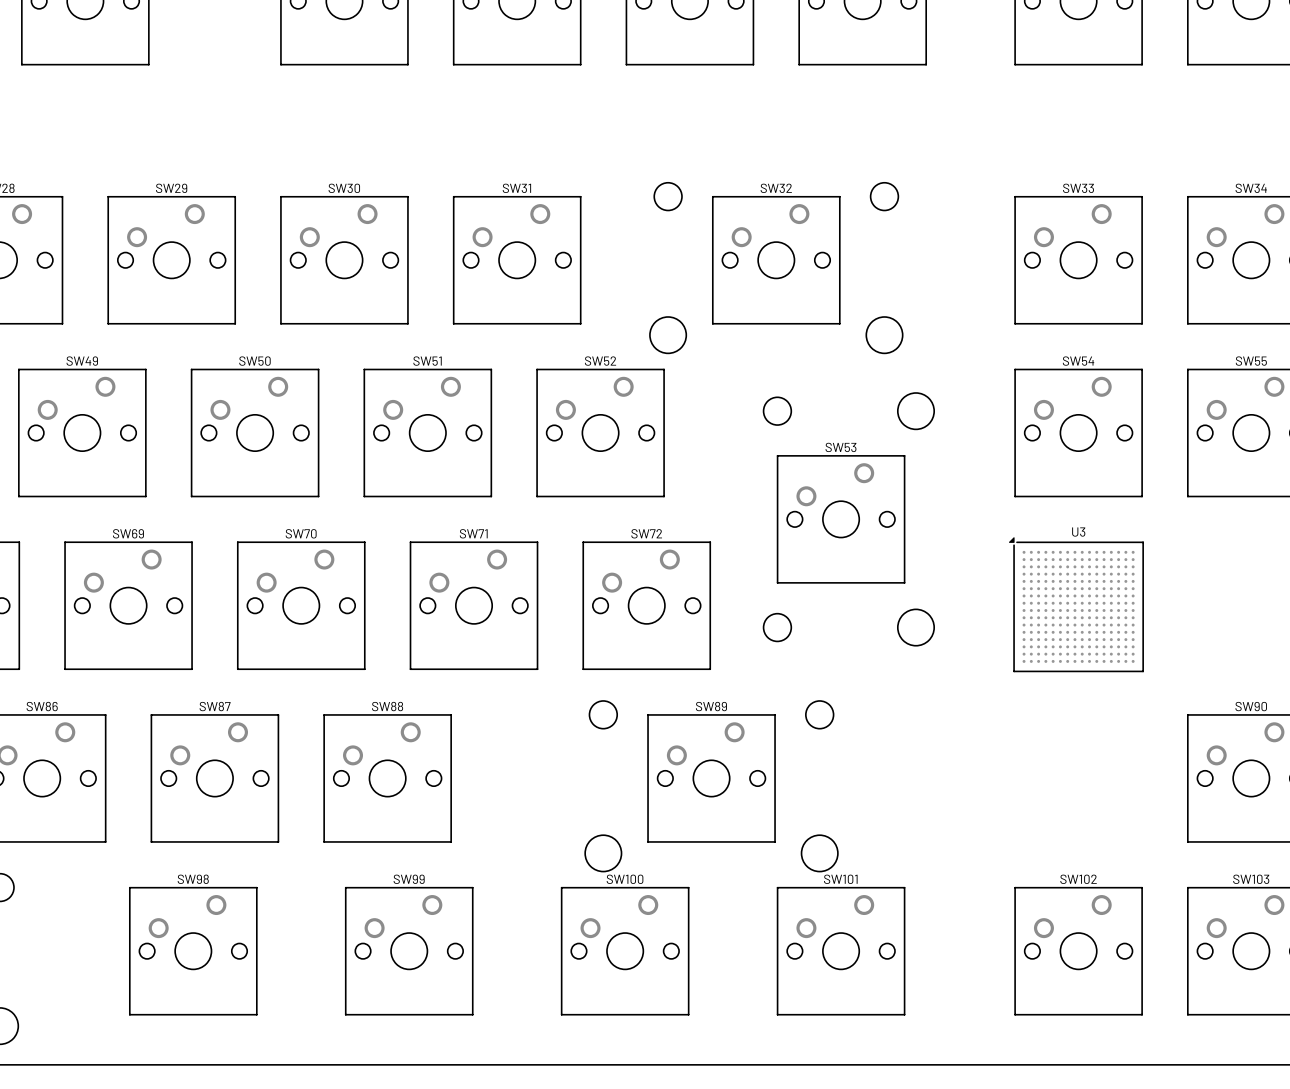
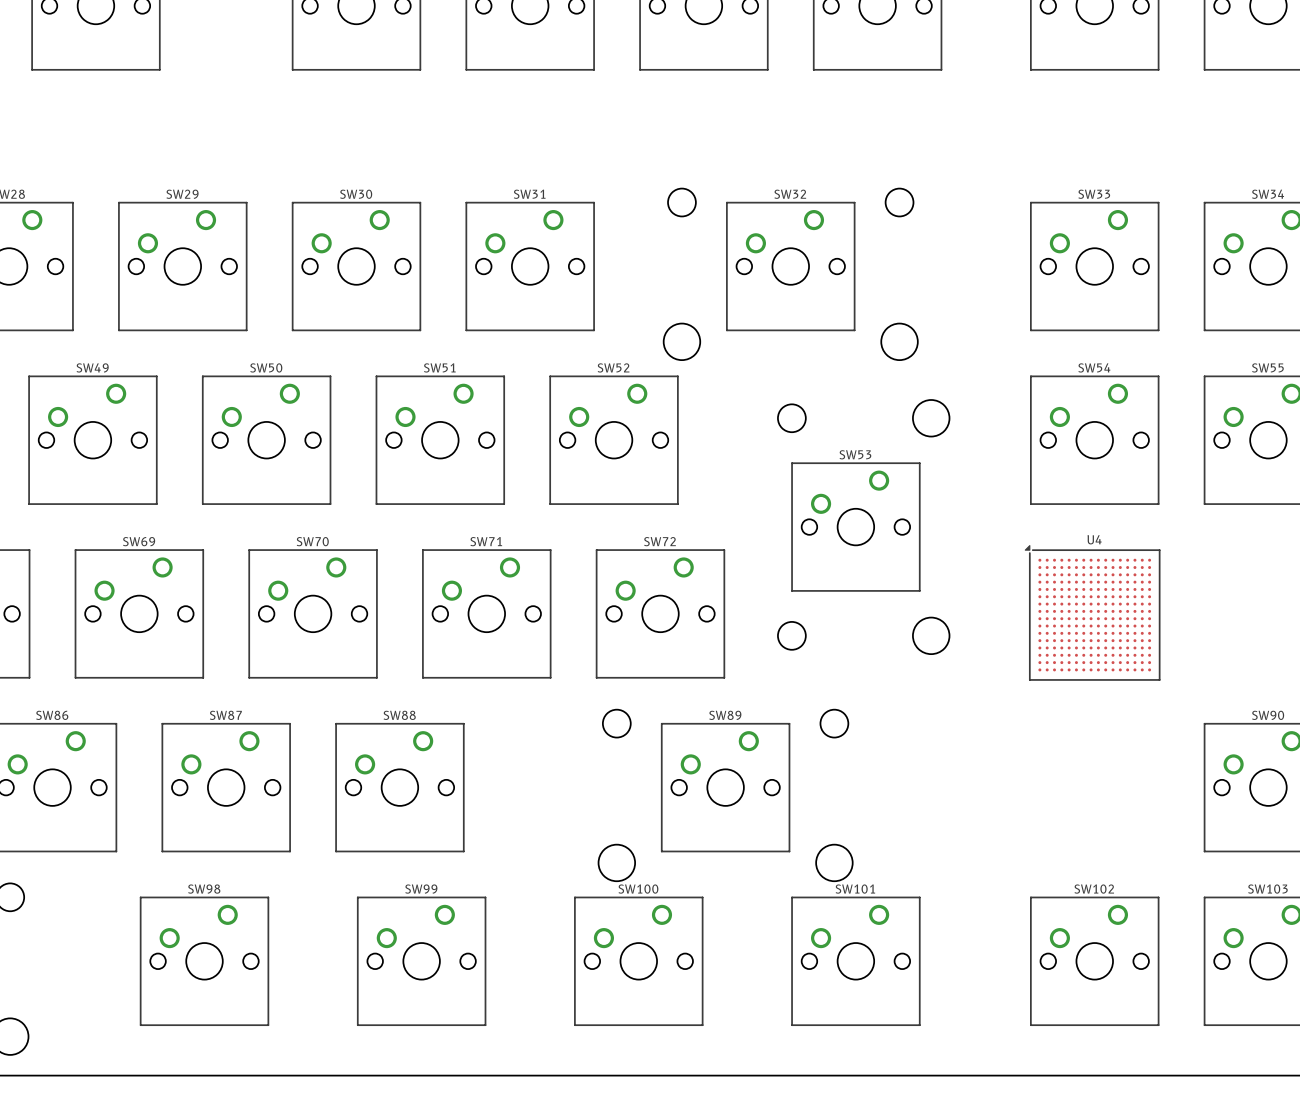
U3 name: U3 (1078, 532) -> U4 (1094, 539)

